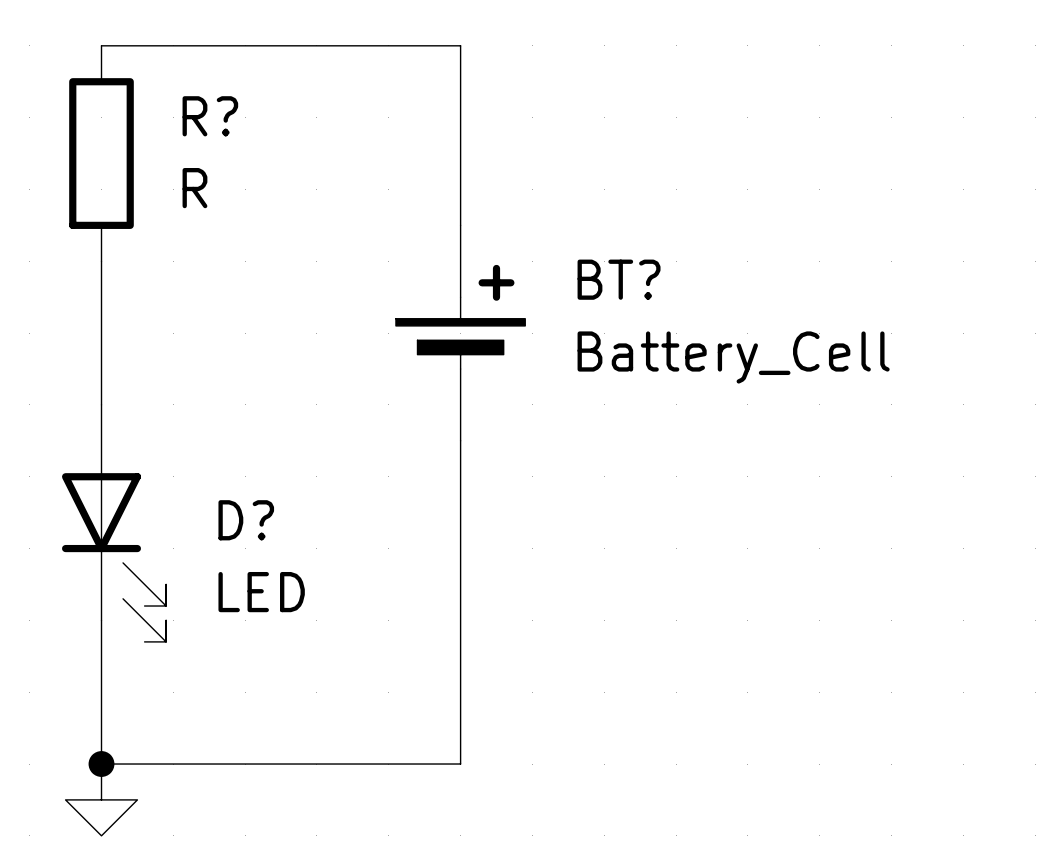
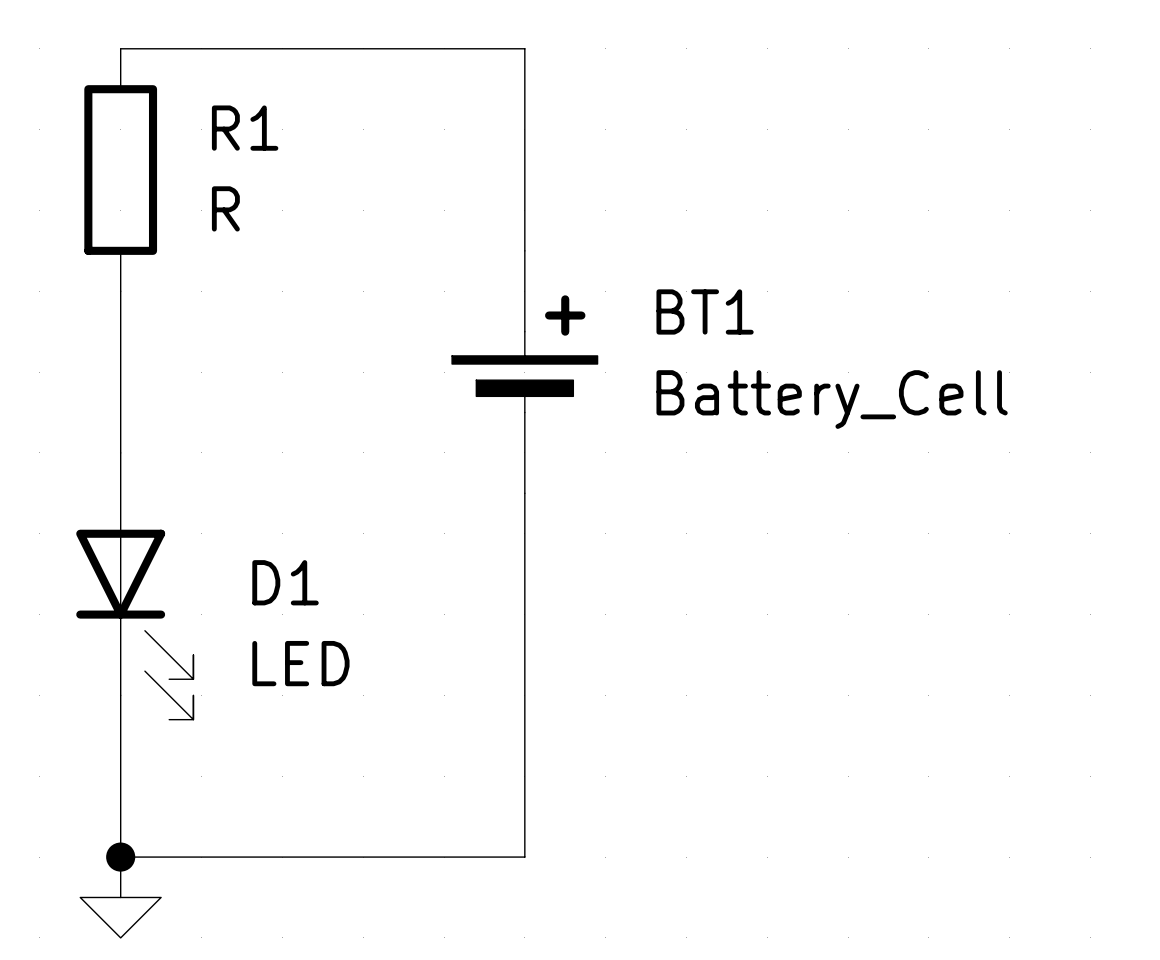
R? name: R? (210, 116) -> R1 (245, 128)
BT? name: BT? (619, 279) -> BT1 (705, 311)
D? name: D? (246, 520) -> D1 (285, 582)

